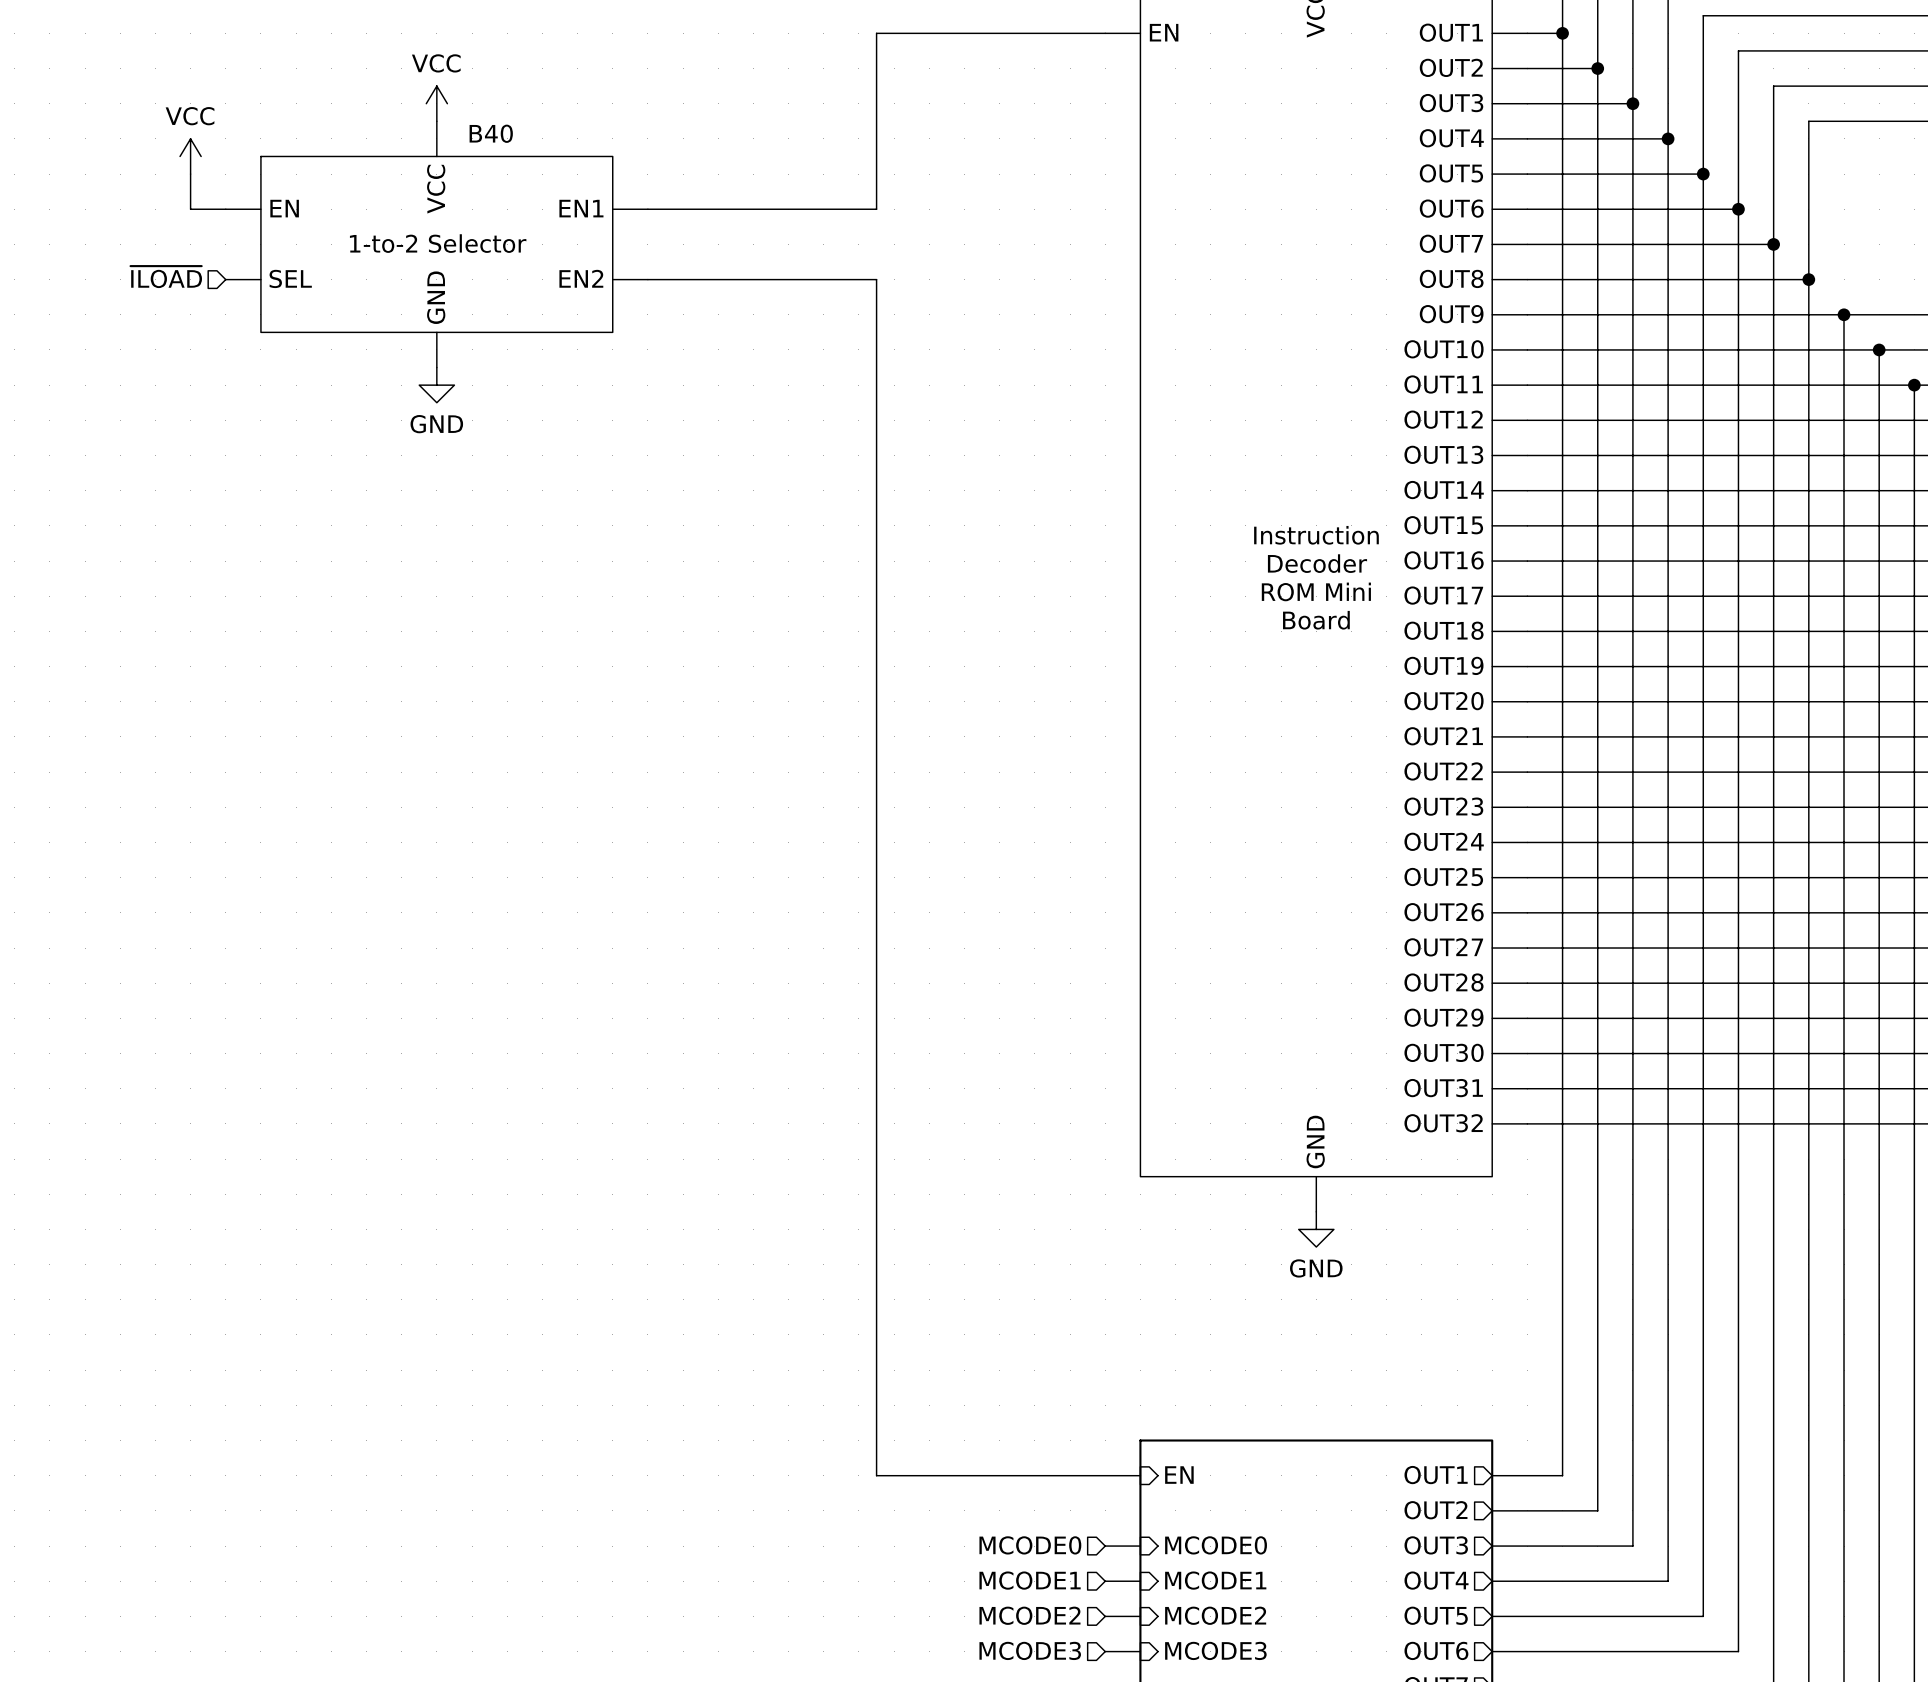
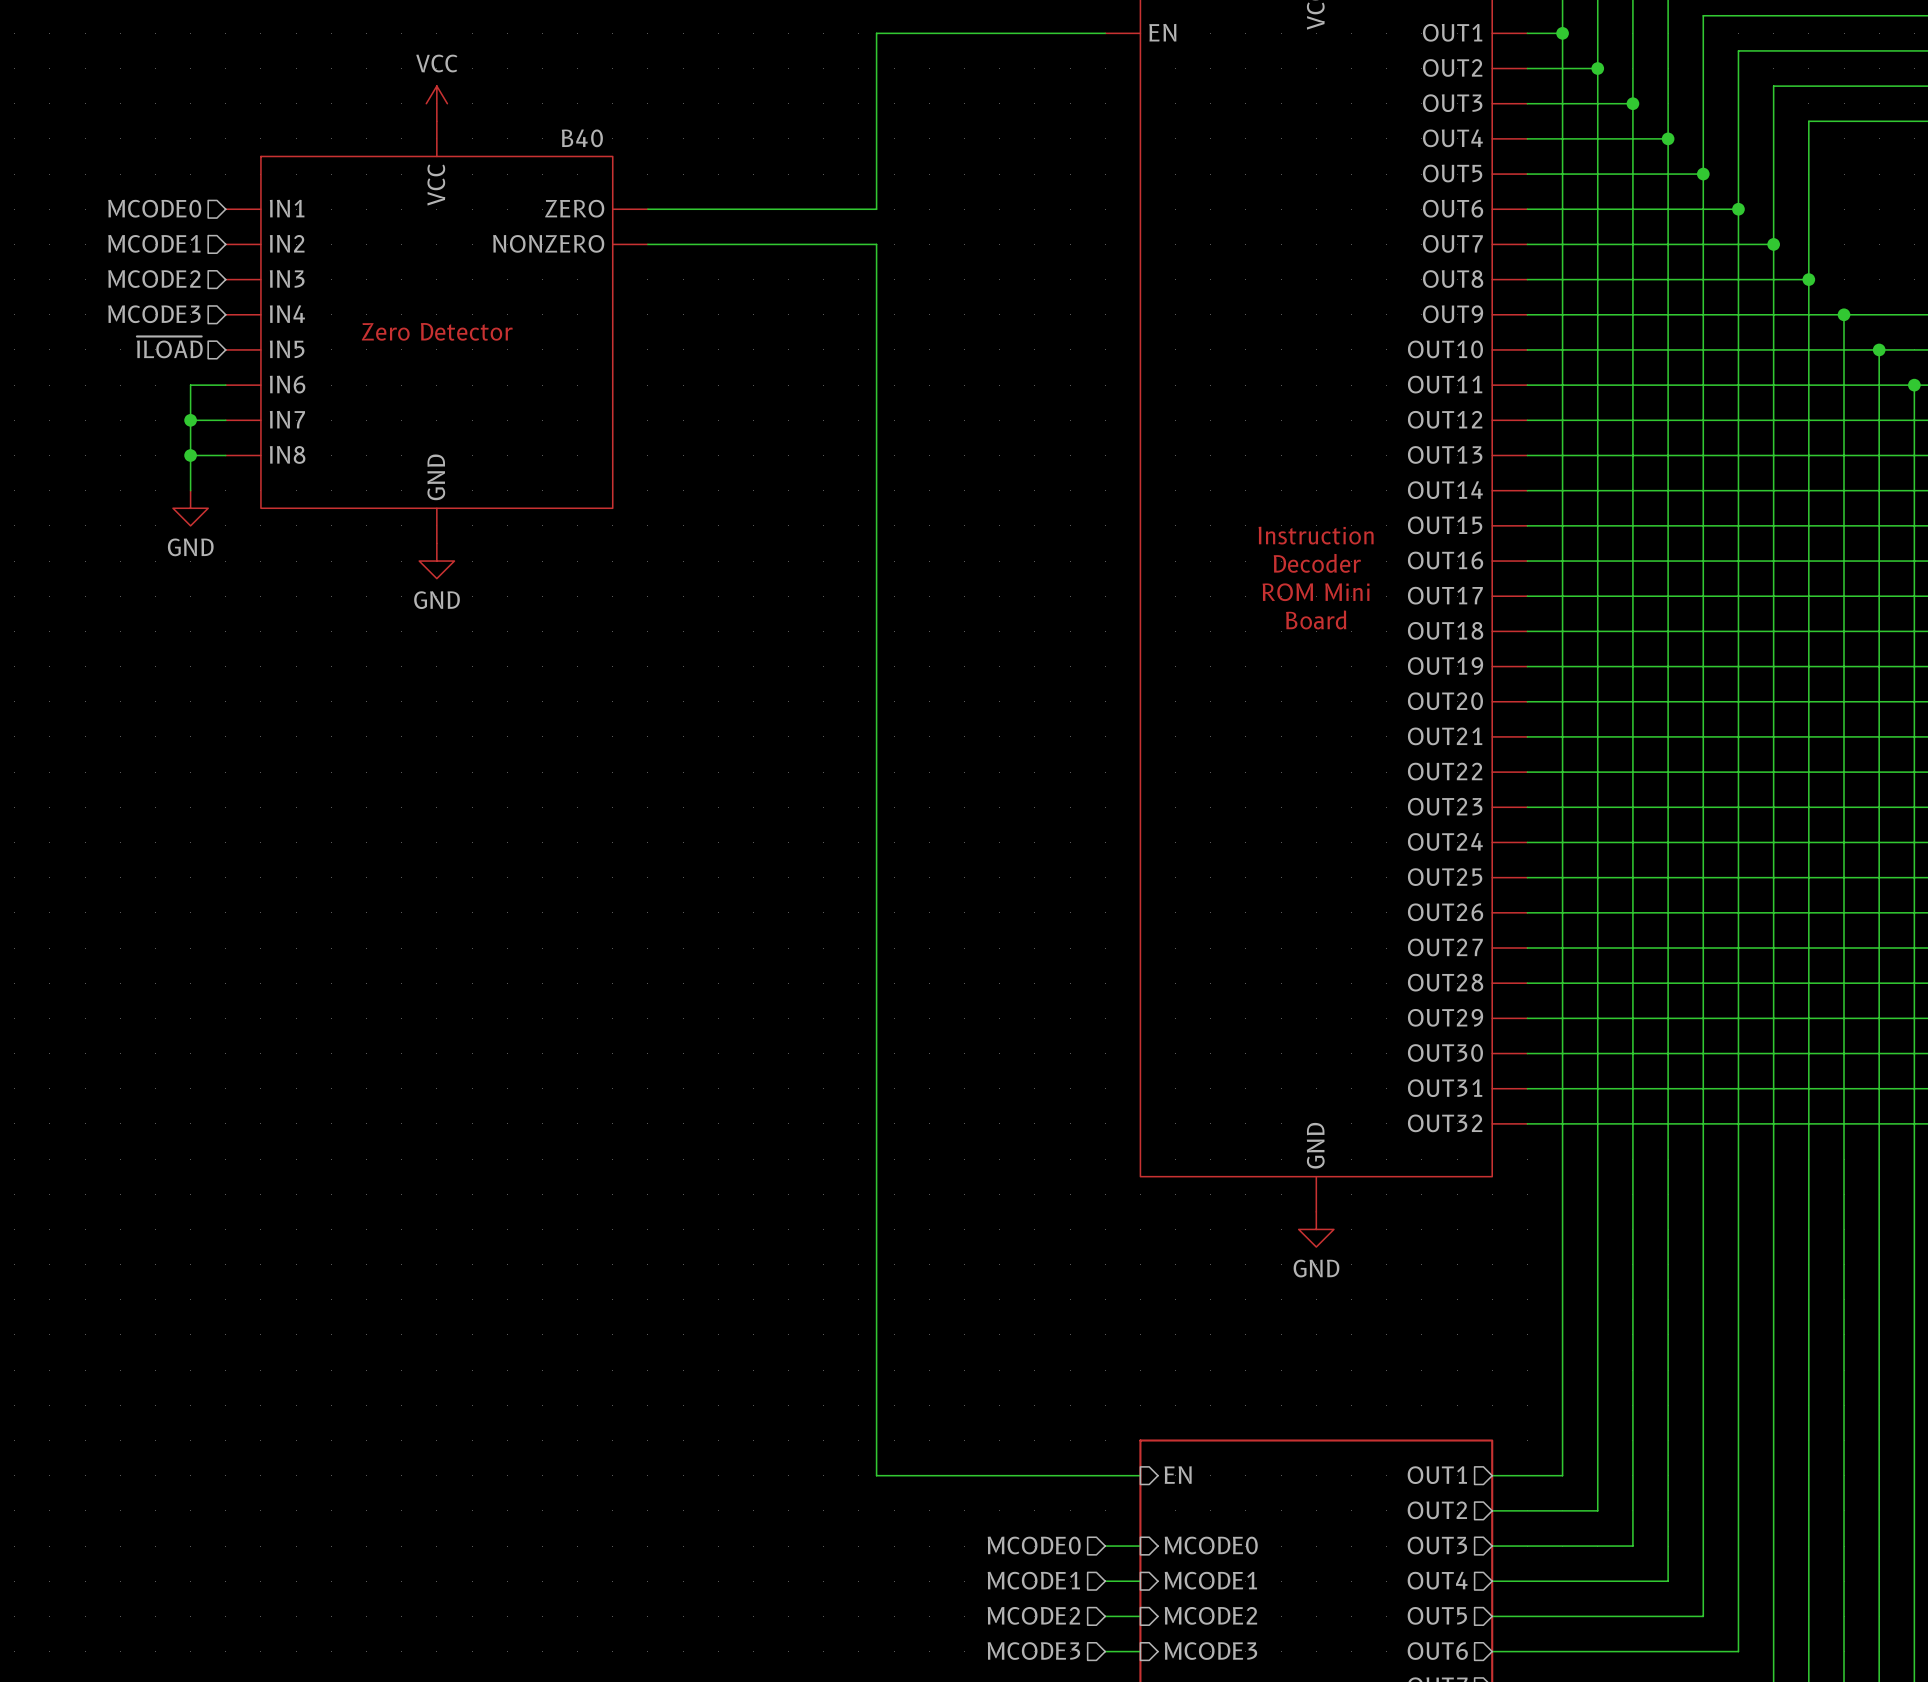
B40 symbol: [225, 121, 648, 368] -> [225, 121, 648, 544]
B40 name position: B40 (491, 133) -> B40 (582, 138)
power symbol: VCC (190, 156) -> none
wire: (190, 174) (190, 209) (225, 209) -> none
hierarchical label: none -> MCODE0 (154, 208)
hierarchical label: none -> MCODE1 (154, 243)
hierarchical label: ~{ILOAD} (166, 277) -> MCODE2 (154, 279)
wire: (647, 279) (876, 279) -> (647, 244) (876, 244) (876, 279)
hierarchical label: none -> MCODE3 (154, 314)
hierarchical label: none -> ~{ILOAD} (169, 347)
wire: none -> (225, 385) (190, 385) (190, 490)
power symbol: GND (436, 385) -> none
wire: none -> (190, 420) (225, 420)
junction: none -> (190, 420)
wire: none -> (190, 455) (225, 455)
junction: none -> (190, 455)
power symbol: none -> GND (190, 508)
power symbol: none -> GND (436, 561)

